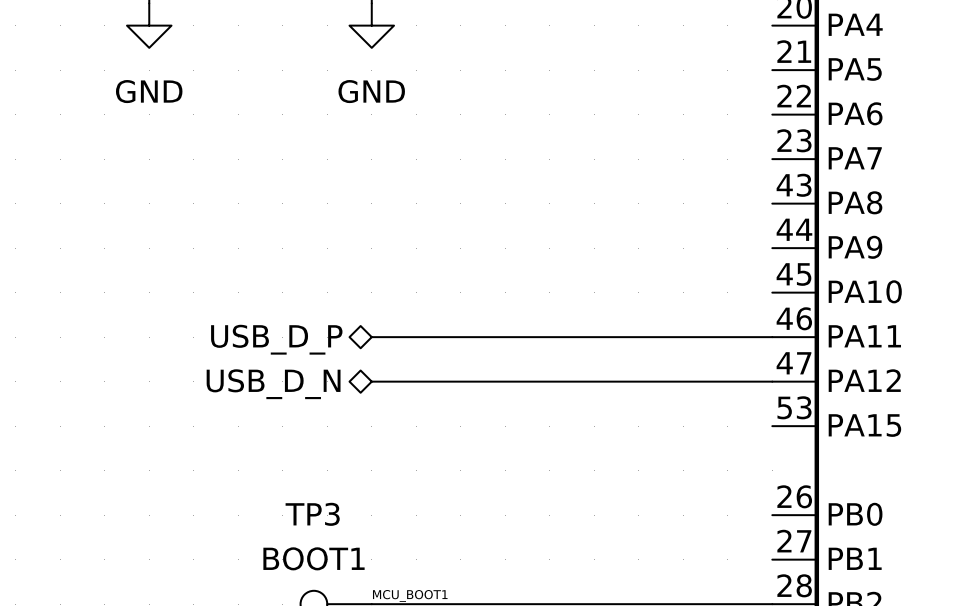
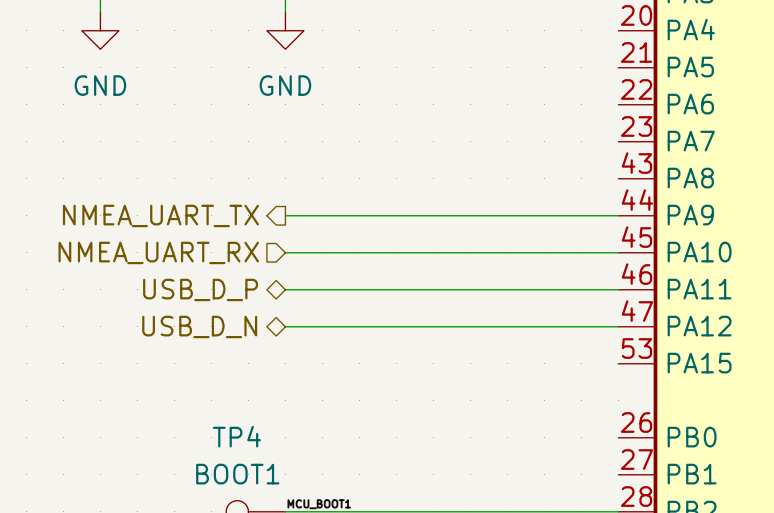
wire: none -> (285, 215) (618, 215)
hierarchical label: none -> NMEA_UART_TX (160, 215)
wire: none -> (285, 252) (618, 252)
hierarchical label: none -> NMEA_UART_RX (158, 252)
TP3 name: TP3 (312, 514) -> TP4 (236, 436)

